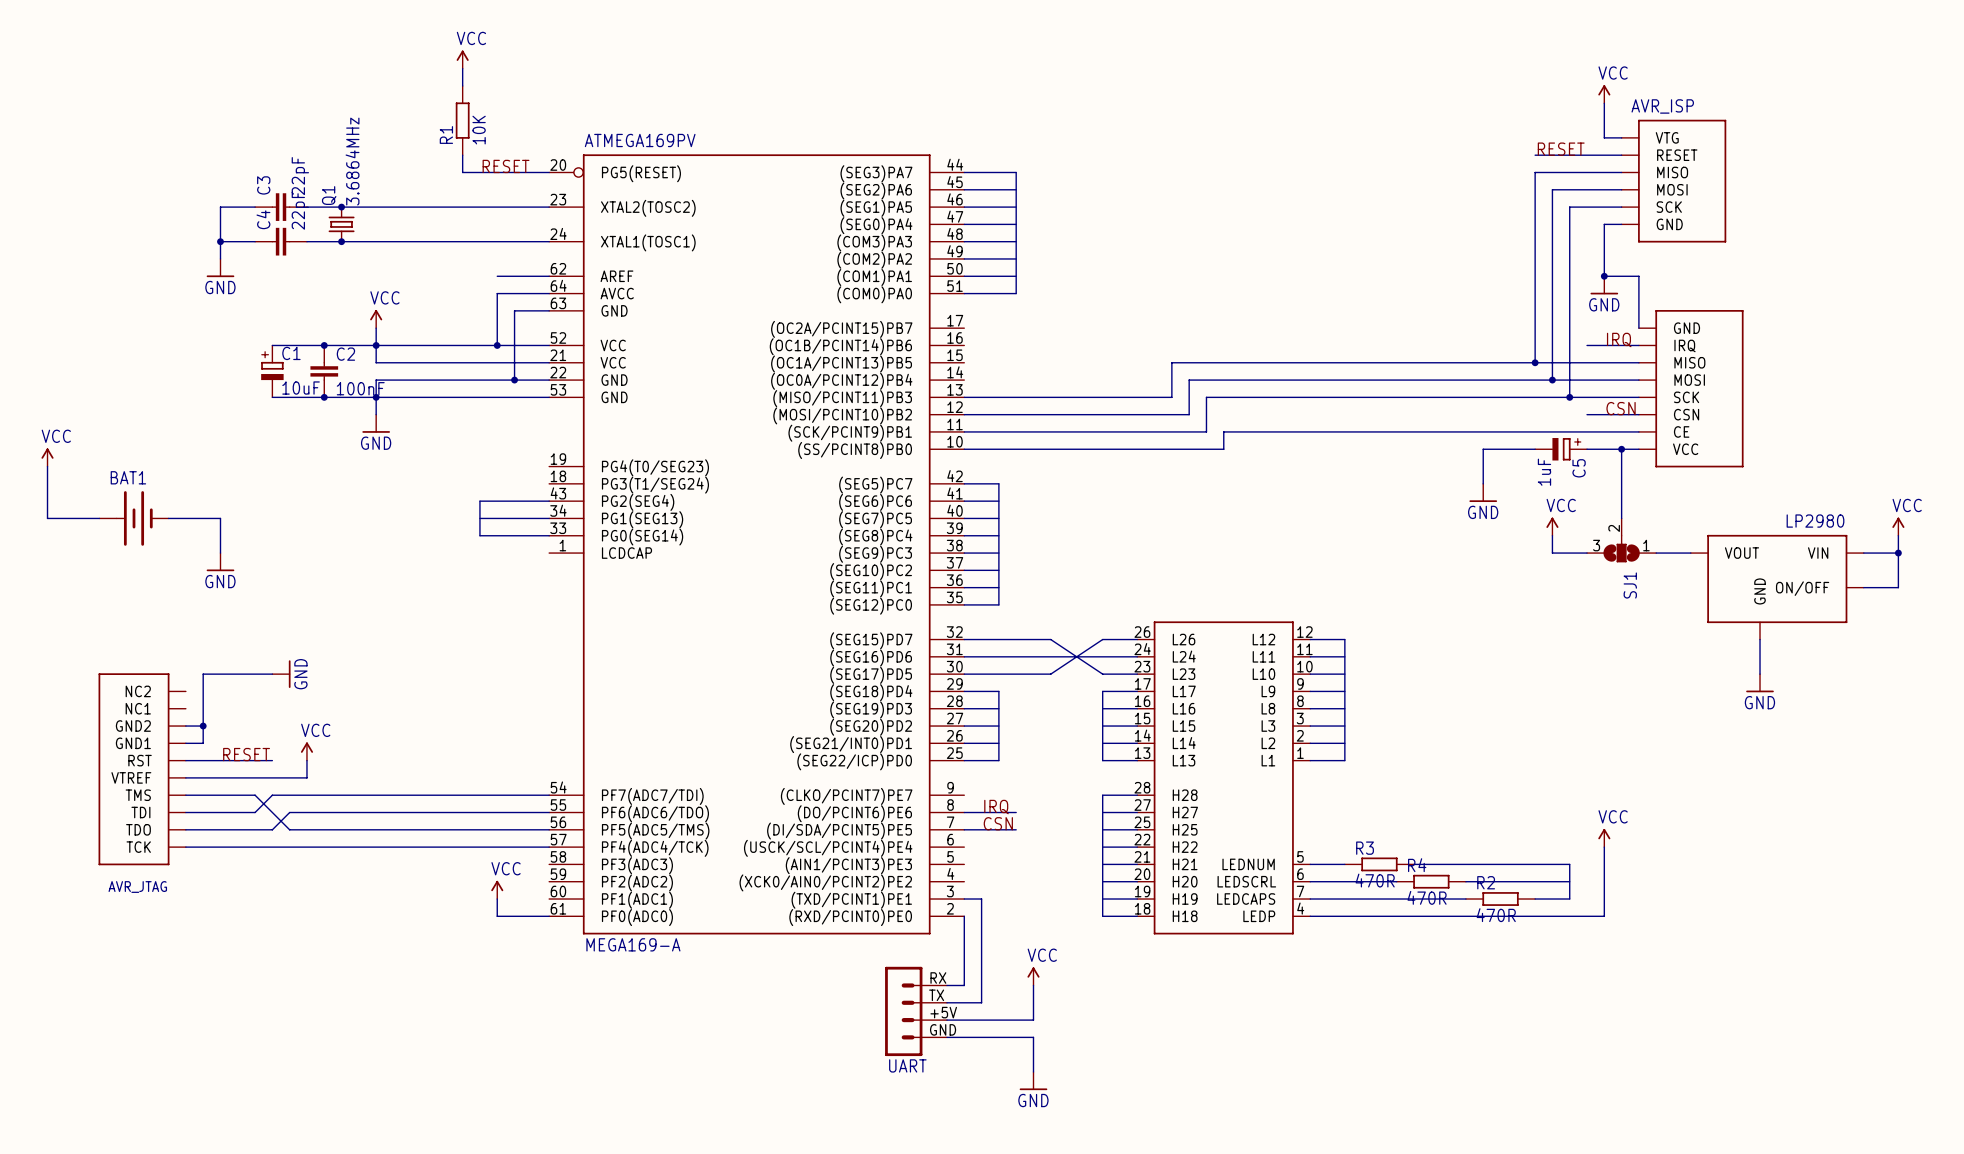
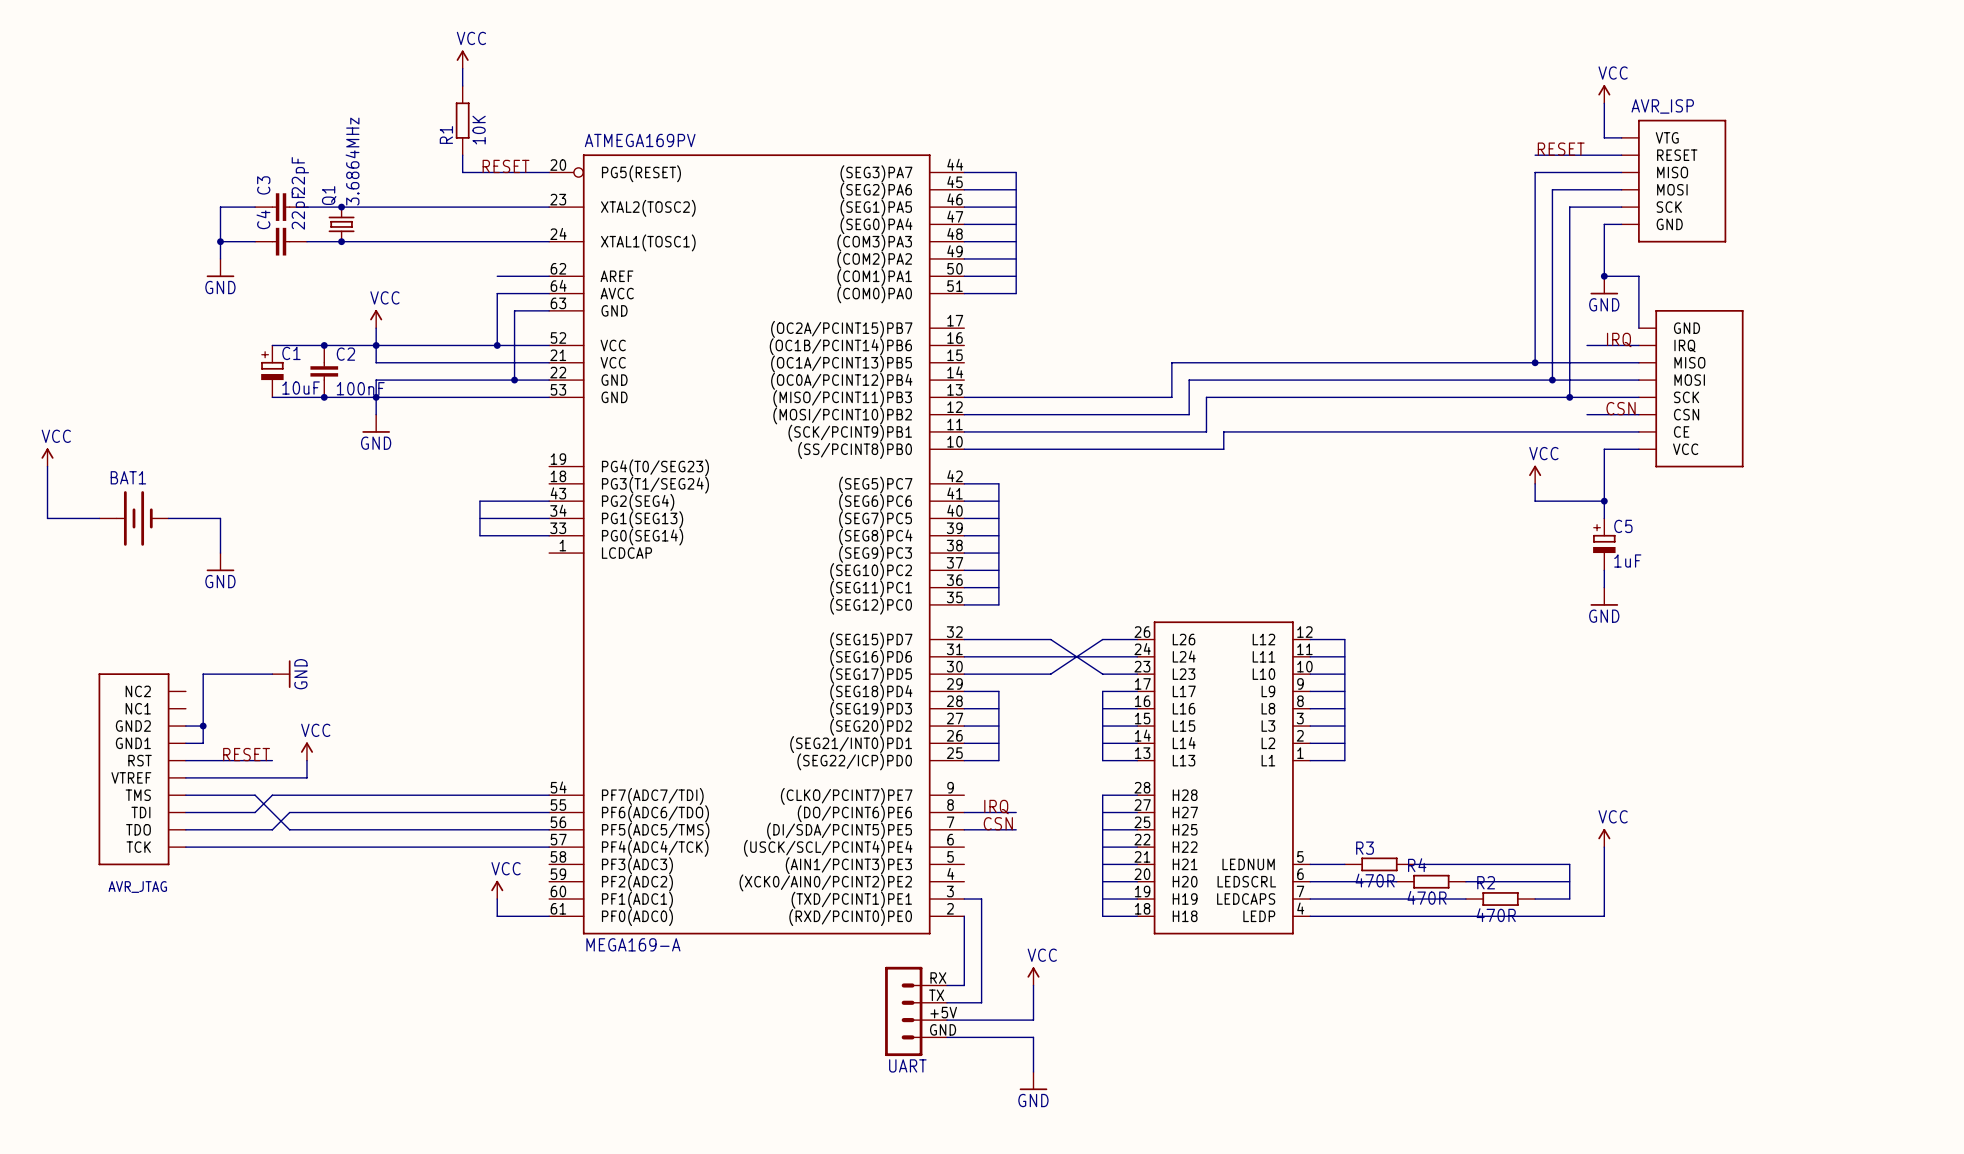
wire: (1535, 449) (1483, 449) (1483, 483) -> none
C5 rotation: 0° (1561, 449) -> 90° counterclockwise (1604, 543)
C5 position: (1561, 449) -> (1604, 544)
wire: (1587, 449) (1604, 449) -> (1604, 518) (1604, 449)
wire: (1621, 449) (1621, 518) -> none
junction: (1621, 449) -> none
wire: none -> (1535, 483) (1535, 501) (1604, 501)
power symbol: GND (1483, 492) -> none
junction: none -> (1604, 501)
power symbol position: VCC (1552, 526) -> VCC (1535, 474)
power symbol: VCC (1898, 526) -> none
wire: (1552, 535) (1552, 553) (1587, 553) -> none
wire: (1898, 535) (1898, 587) (1863, 587) -> none
SJ1: (1621, 540) -> none
wire: (1656, 553) (1690, 553) -> none
wire: (1863, 553) (1898, 553) -> none
junction: (1898, 553) -> none
wire: none -> (1604, 570) (1604, 587)
LP2980: (1777, 587) -> none
power symbol: none -> GND (1604, 596)
wire: (1760, 639) (1760, 674) -> none
power symbol: GND (1760, 683) -> none

